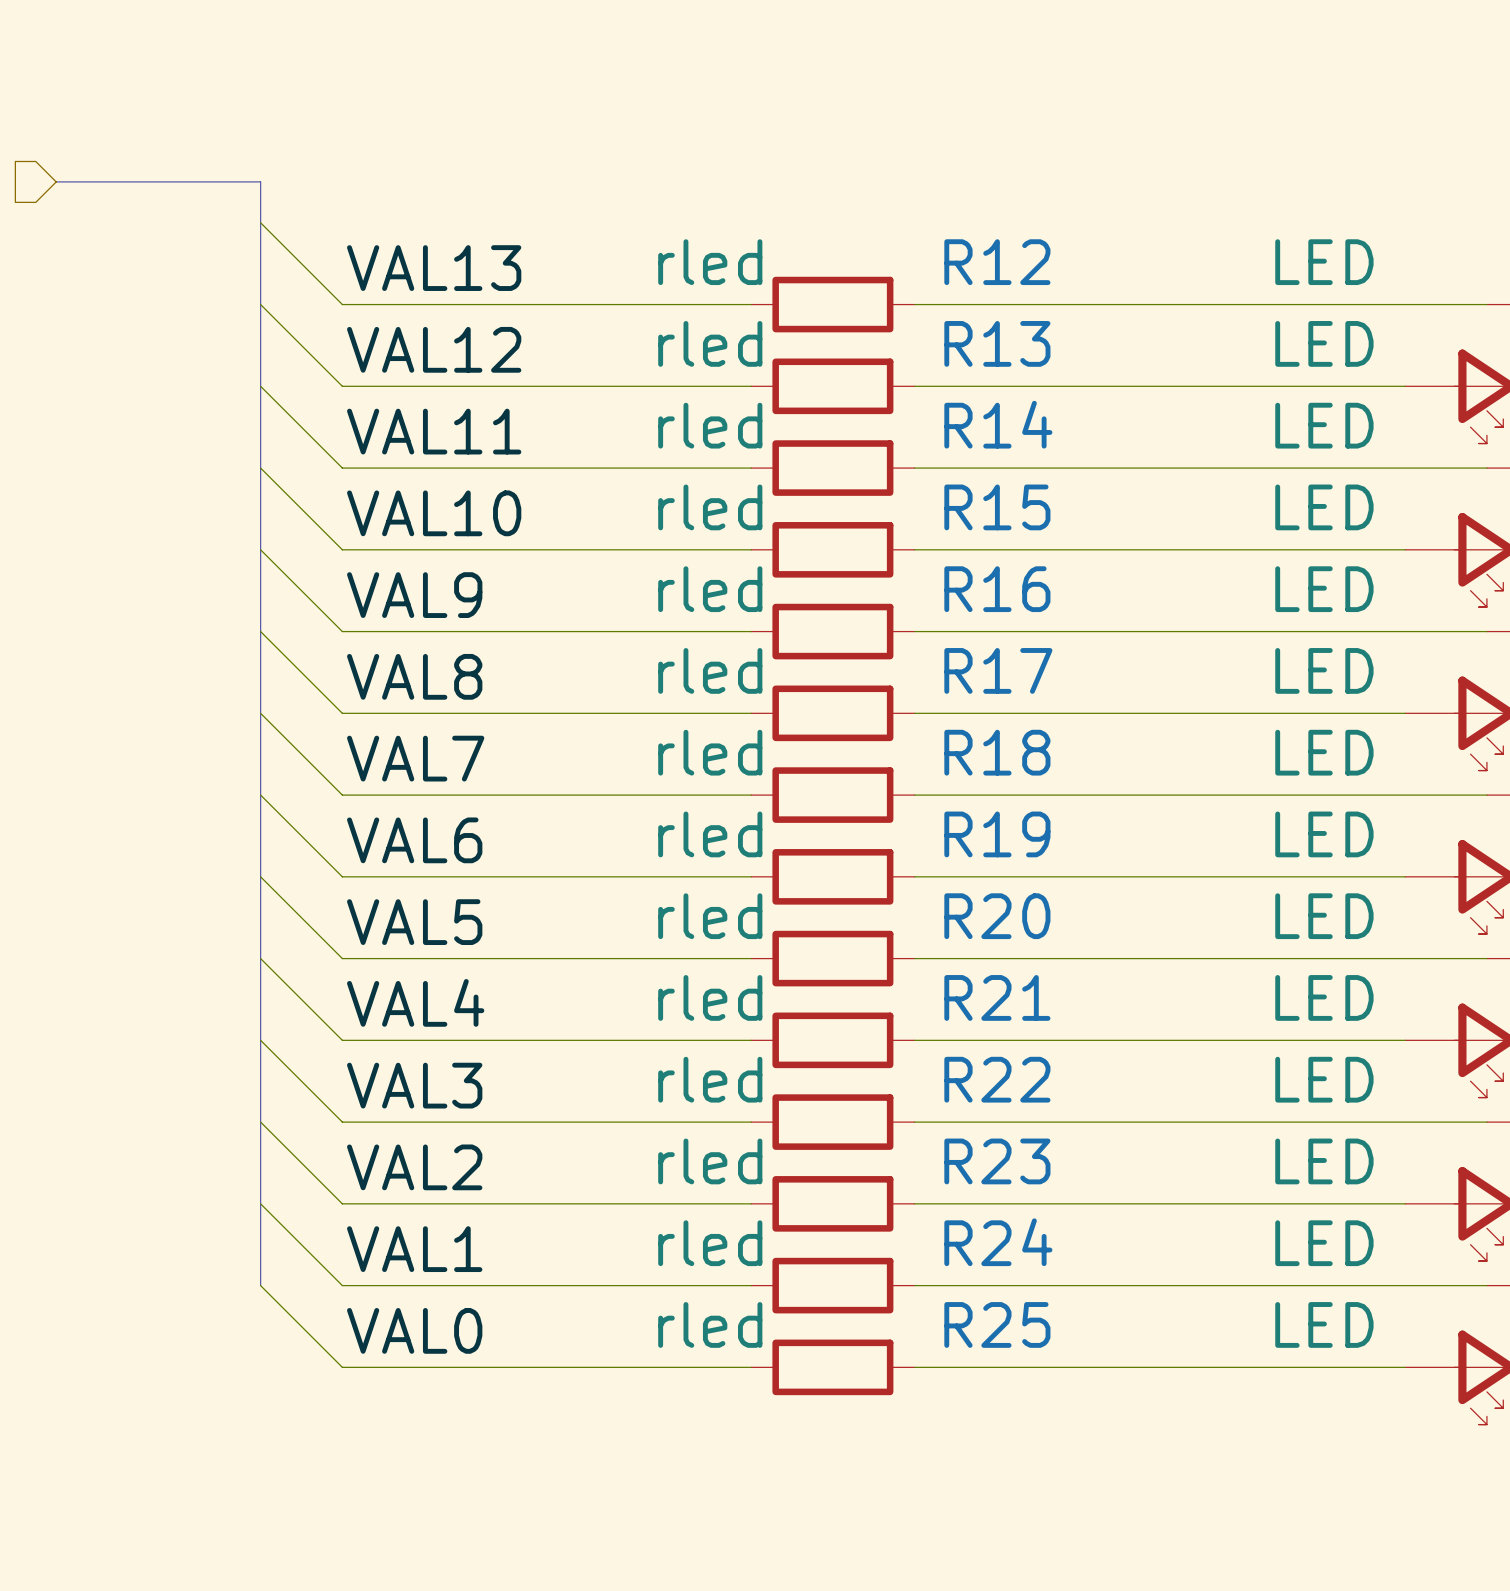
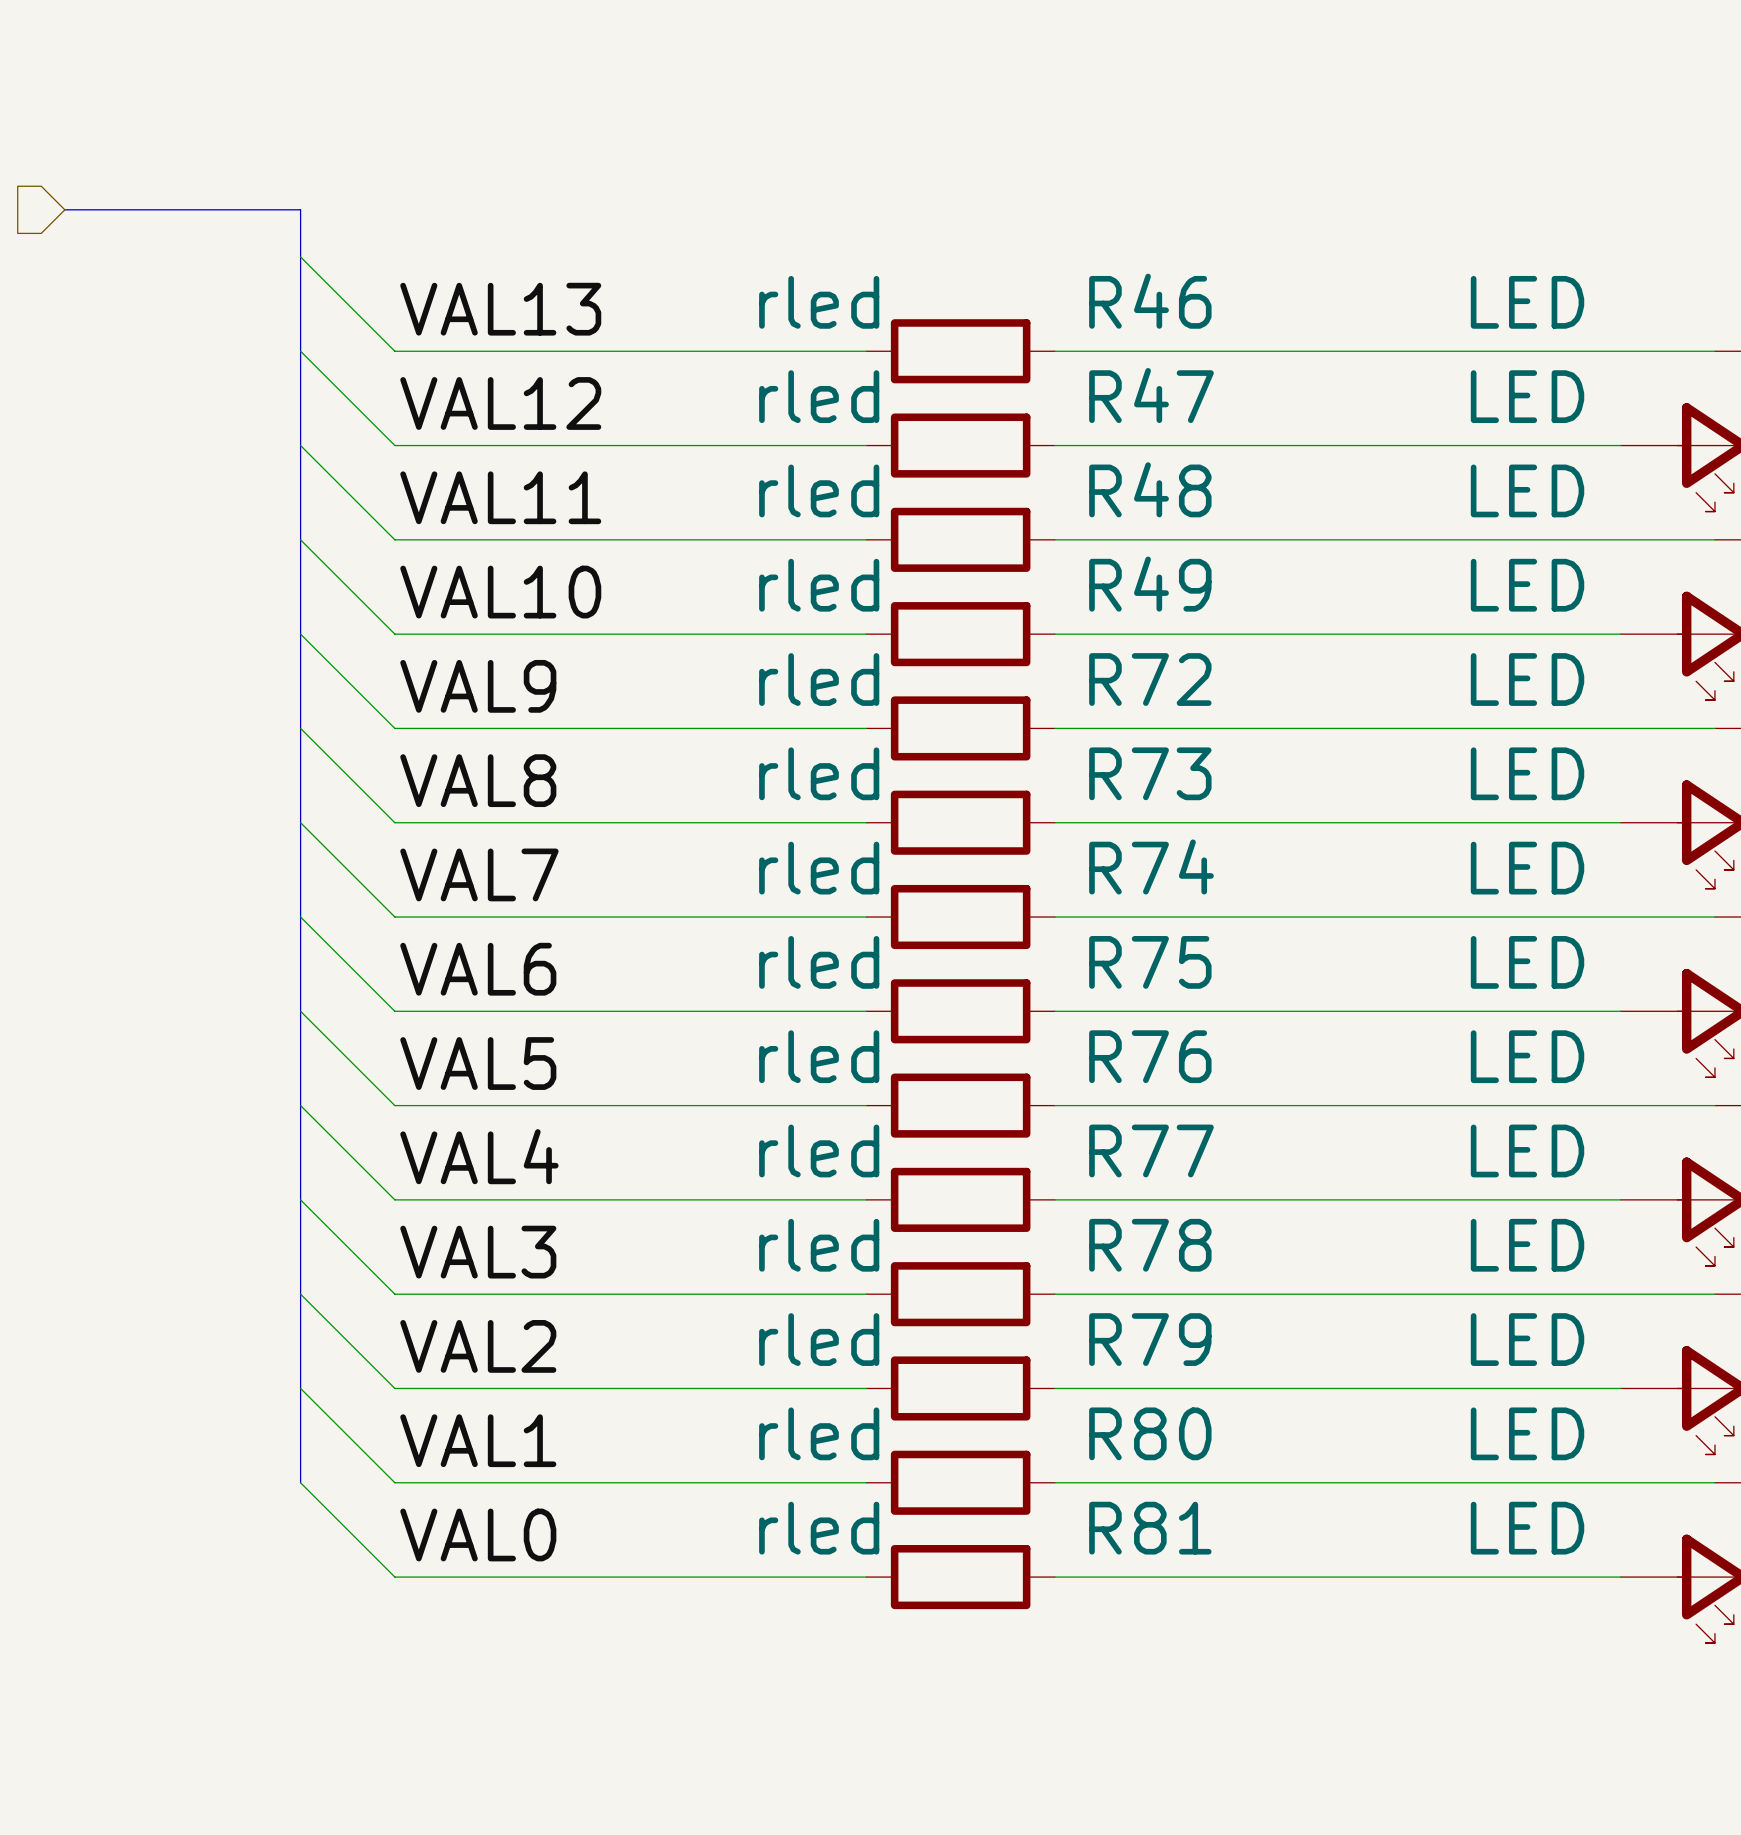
R12 name: R12 (997, 262) -> R46 (1150, 301)
R13 name: R13 (997, 343) -> R47 (1151, 395)
R14 name: R14 (998, 424) -> R48 (1150, 489)
R15 name: R15 (997, 507) -> R49 (1150, 584)
R16 name: R16 (997, 589) -> R72 (1150, 679)
R17 name: R17 (998, 670) -> R73 (1150, 773)
R18 name: R18 (997, 752) -> R74 (1151, 866)
R19 name: R19 (997, 834) -> R75 (1150, 962)
R20 name: R20 (997, 916) -> R76 (1150, 1056)
R21 name: R21 (997, 997) -> R77 (1151, 1150)
R22 name: R22 (997, 1079) -> R78 (1150, 1245)
R23 name: R23 (997, 1161) -> R79 (1150, 1339)
R24 name: R24 (998, 1242) -> R80 (1150, 1433)
R25 name: R25 (997, 1324) -> R81 (1150, 1528)

